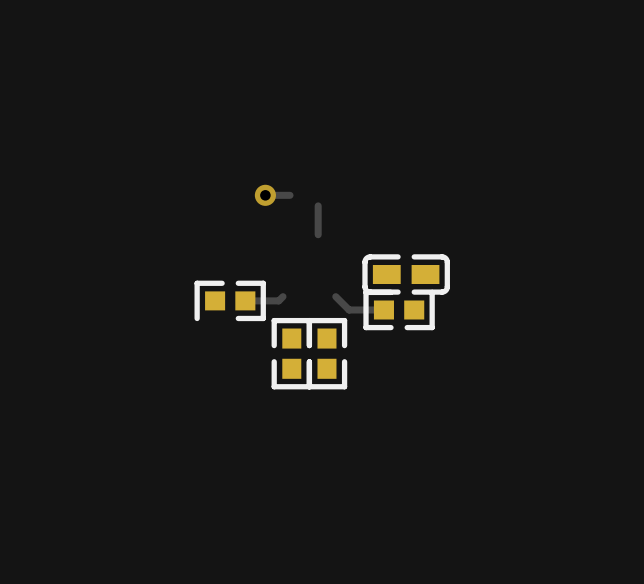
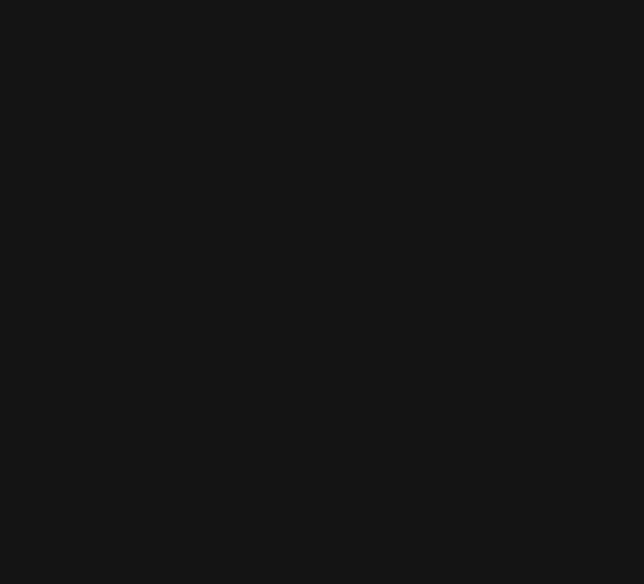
track: (265, 195) (290, 195) -> none
via: (265, 195) -> none
track: (318, 205) (318, 234) -> none
part: (406, 274) -> none
track: (283, 296) (278, 300) (245, 300) -> none
track: (335, 296) (349, 309) (383, 309) -> none
part: (230, 300) -> none
part: (399, 309) -> none
part: (291, 353) -> none
part: (326, 353) -> none

